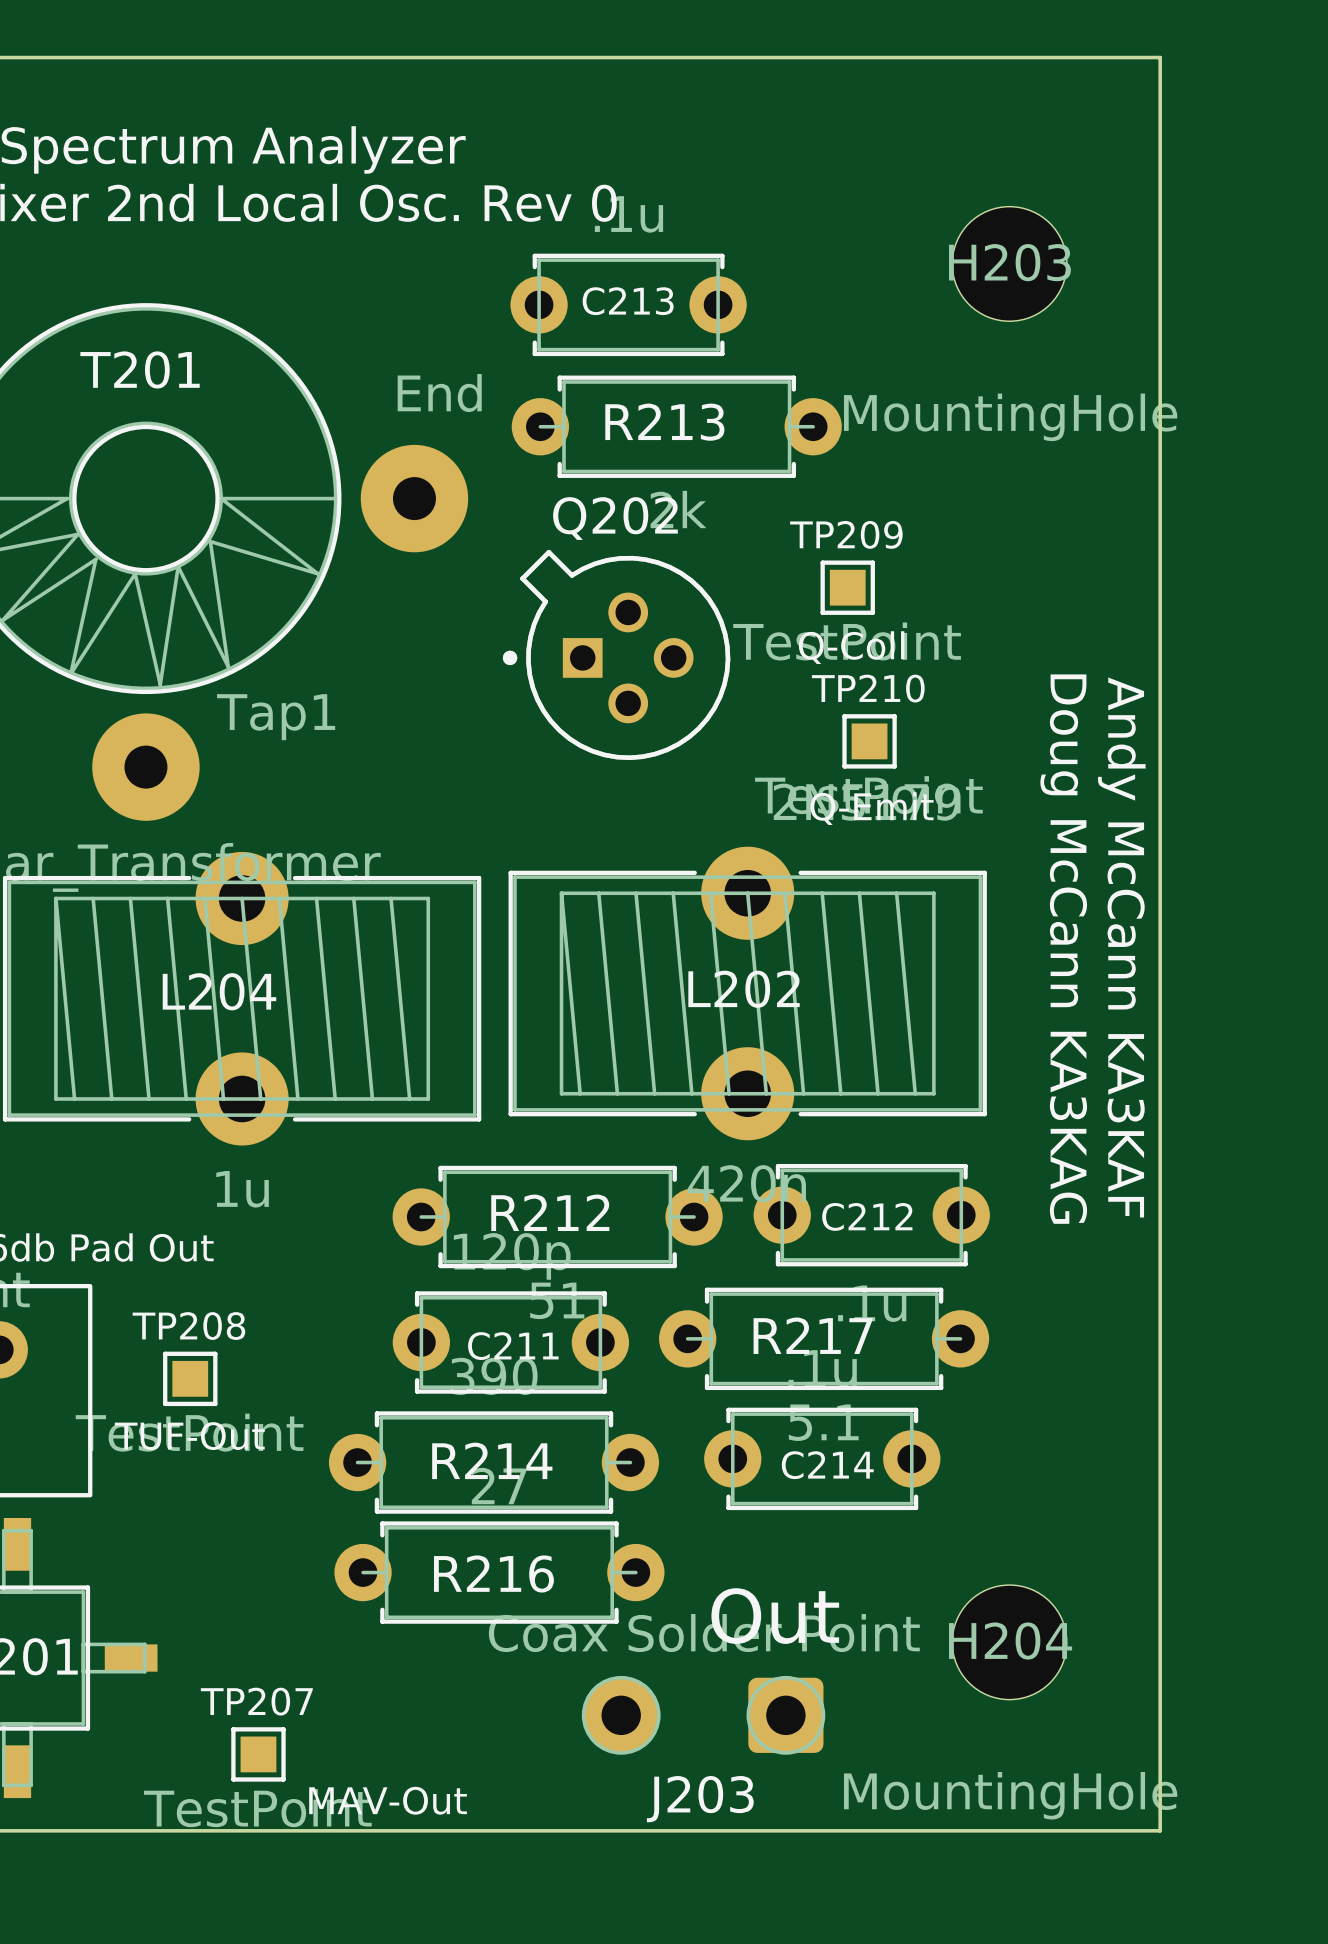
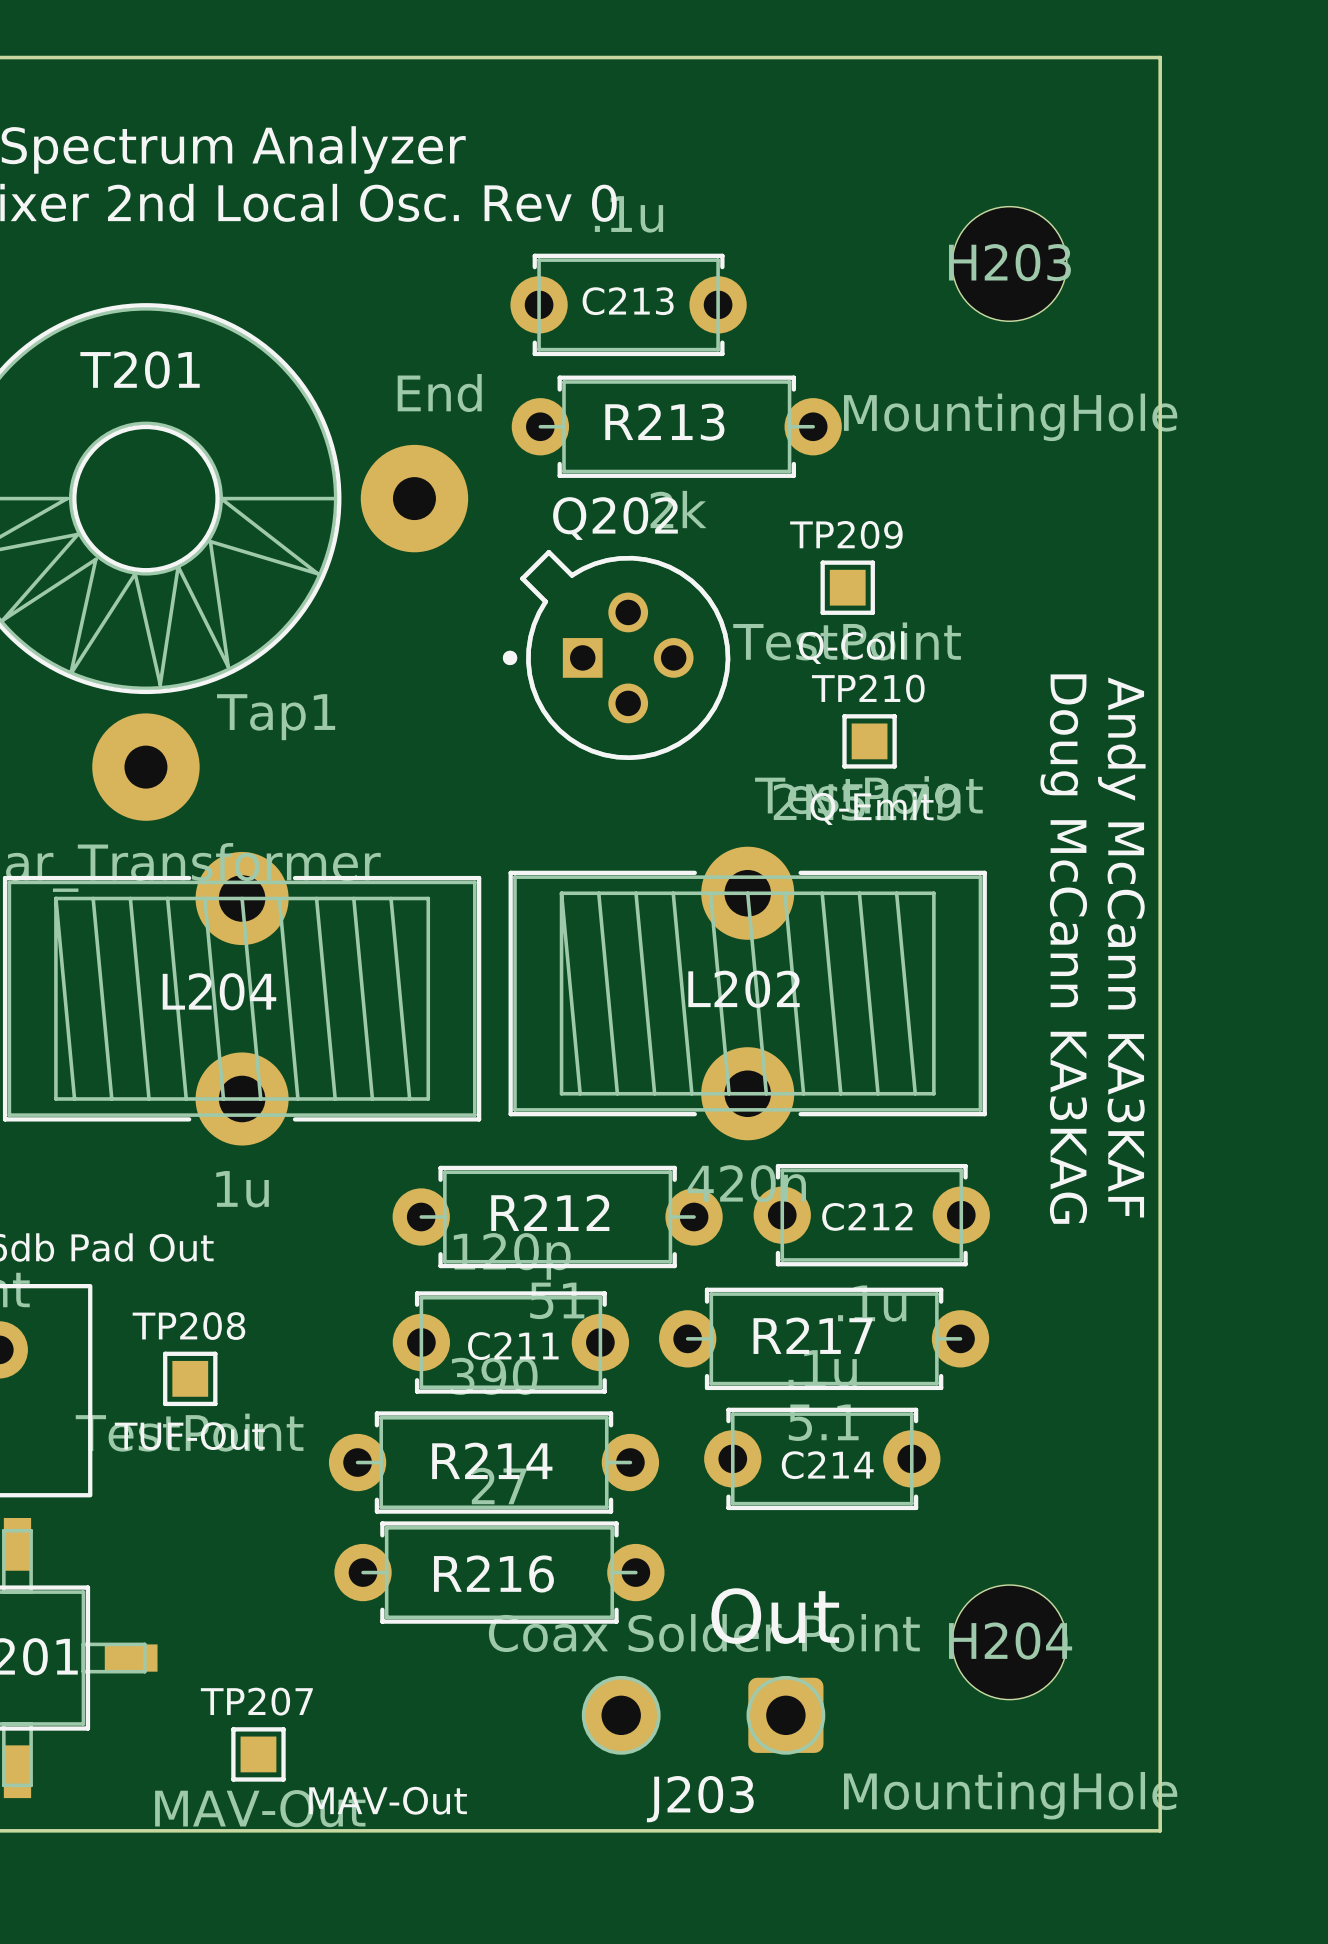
TP207 value: TestPoint (257, 1808) -> MAV-Out (260, 1808)

